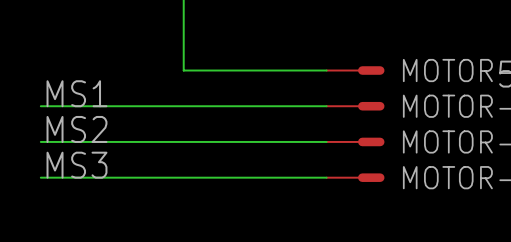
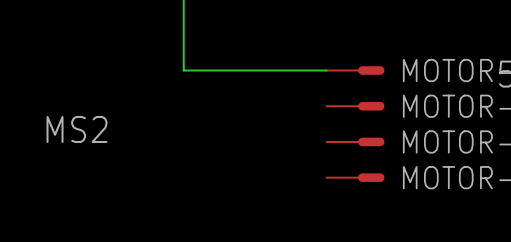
label: MS1 (76, 93) -> none
wire: (40, 106) (326, 106) -> none
wire: (40, 141) (326, 141) -> none
label: MS3 (76, 165) -> none
wire: (40, 177) (326, 177) -> none

